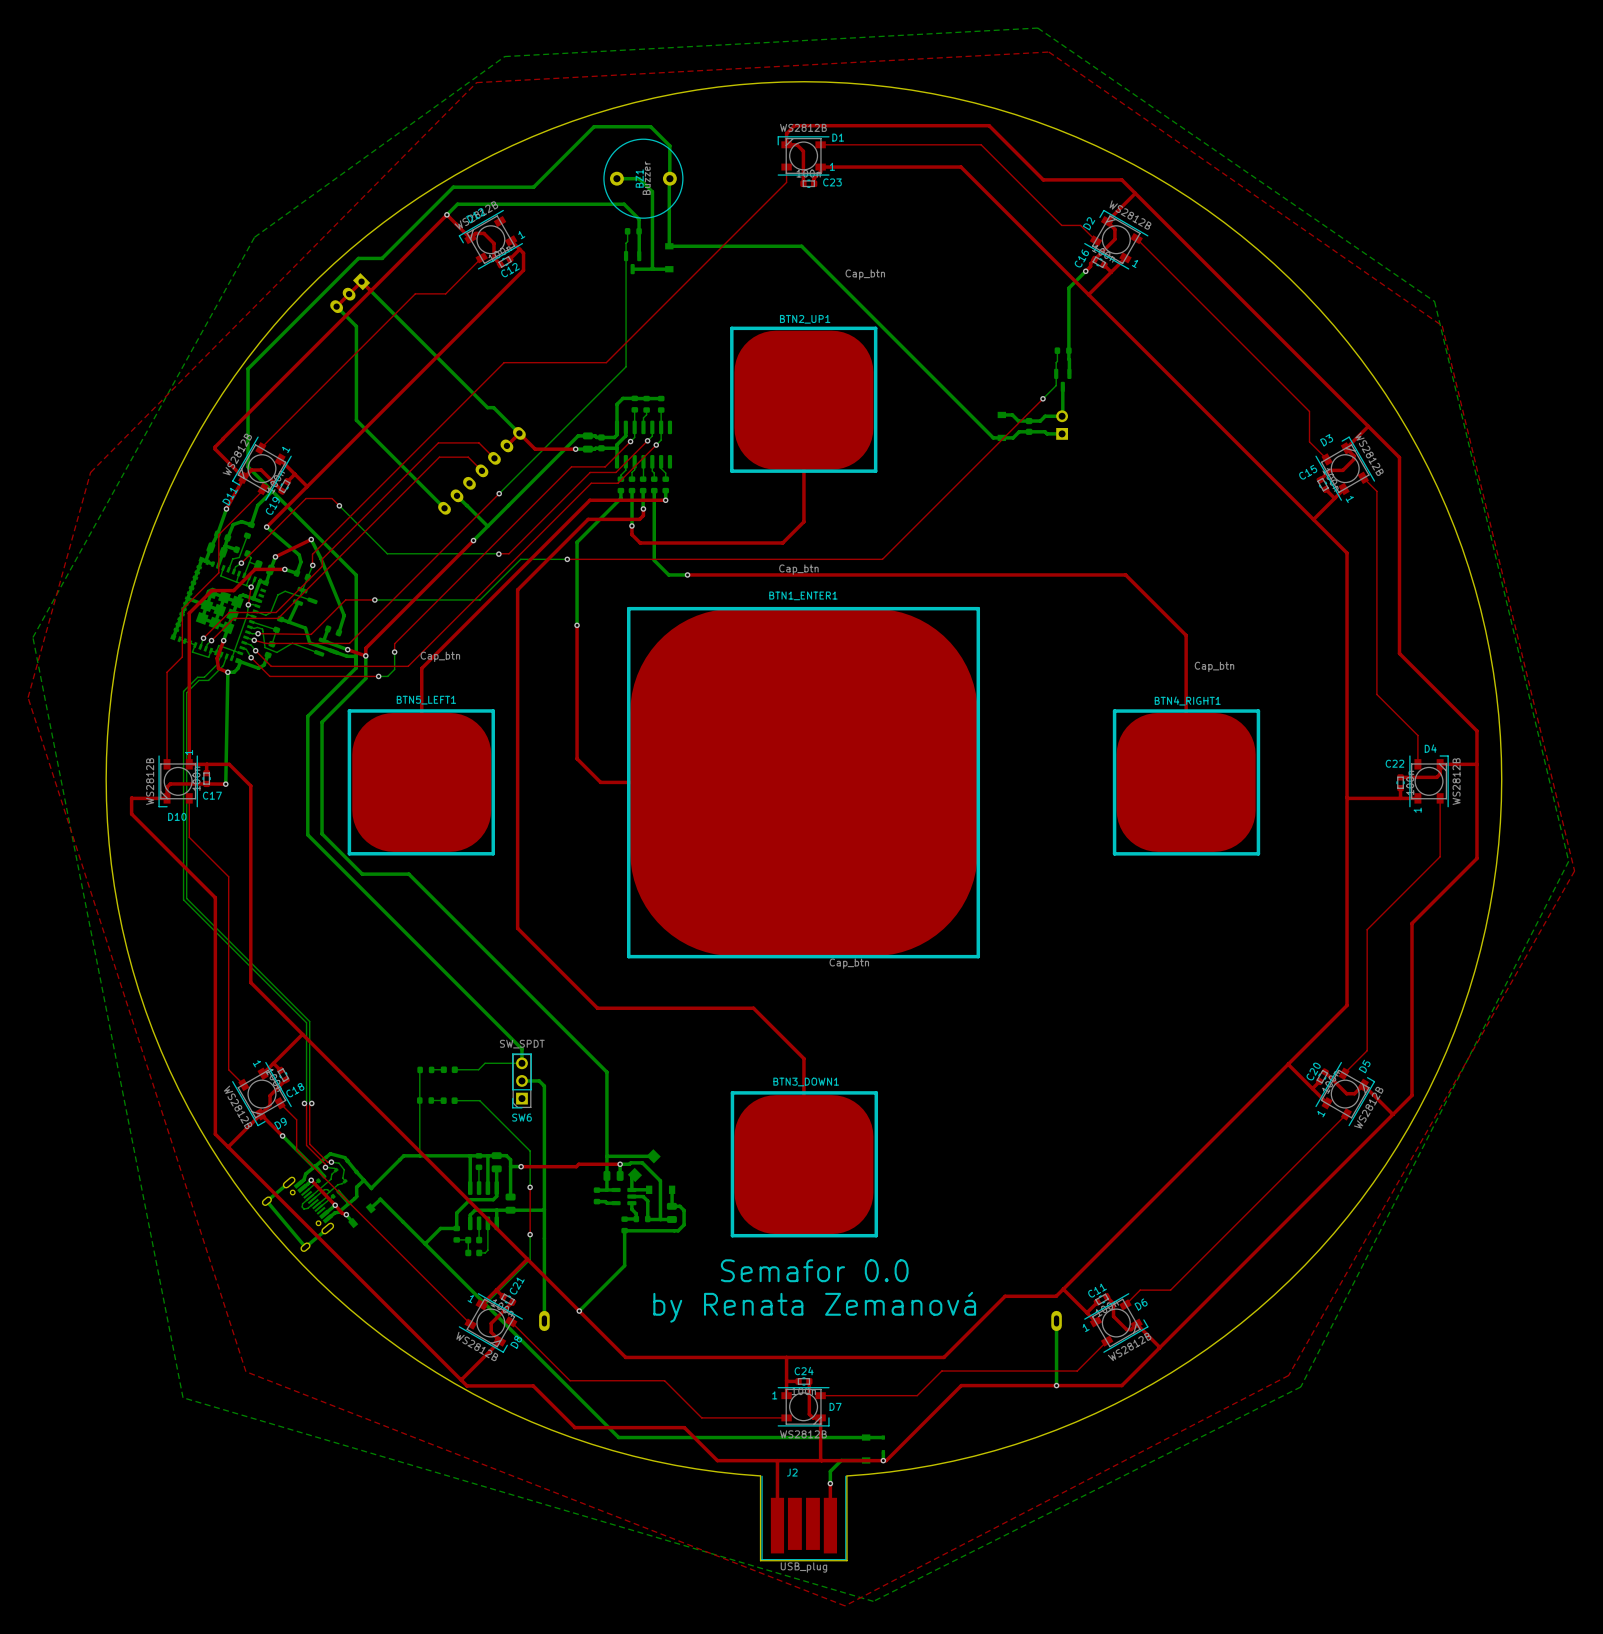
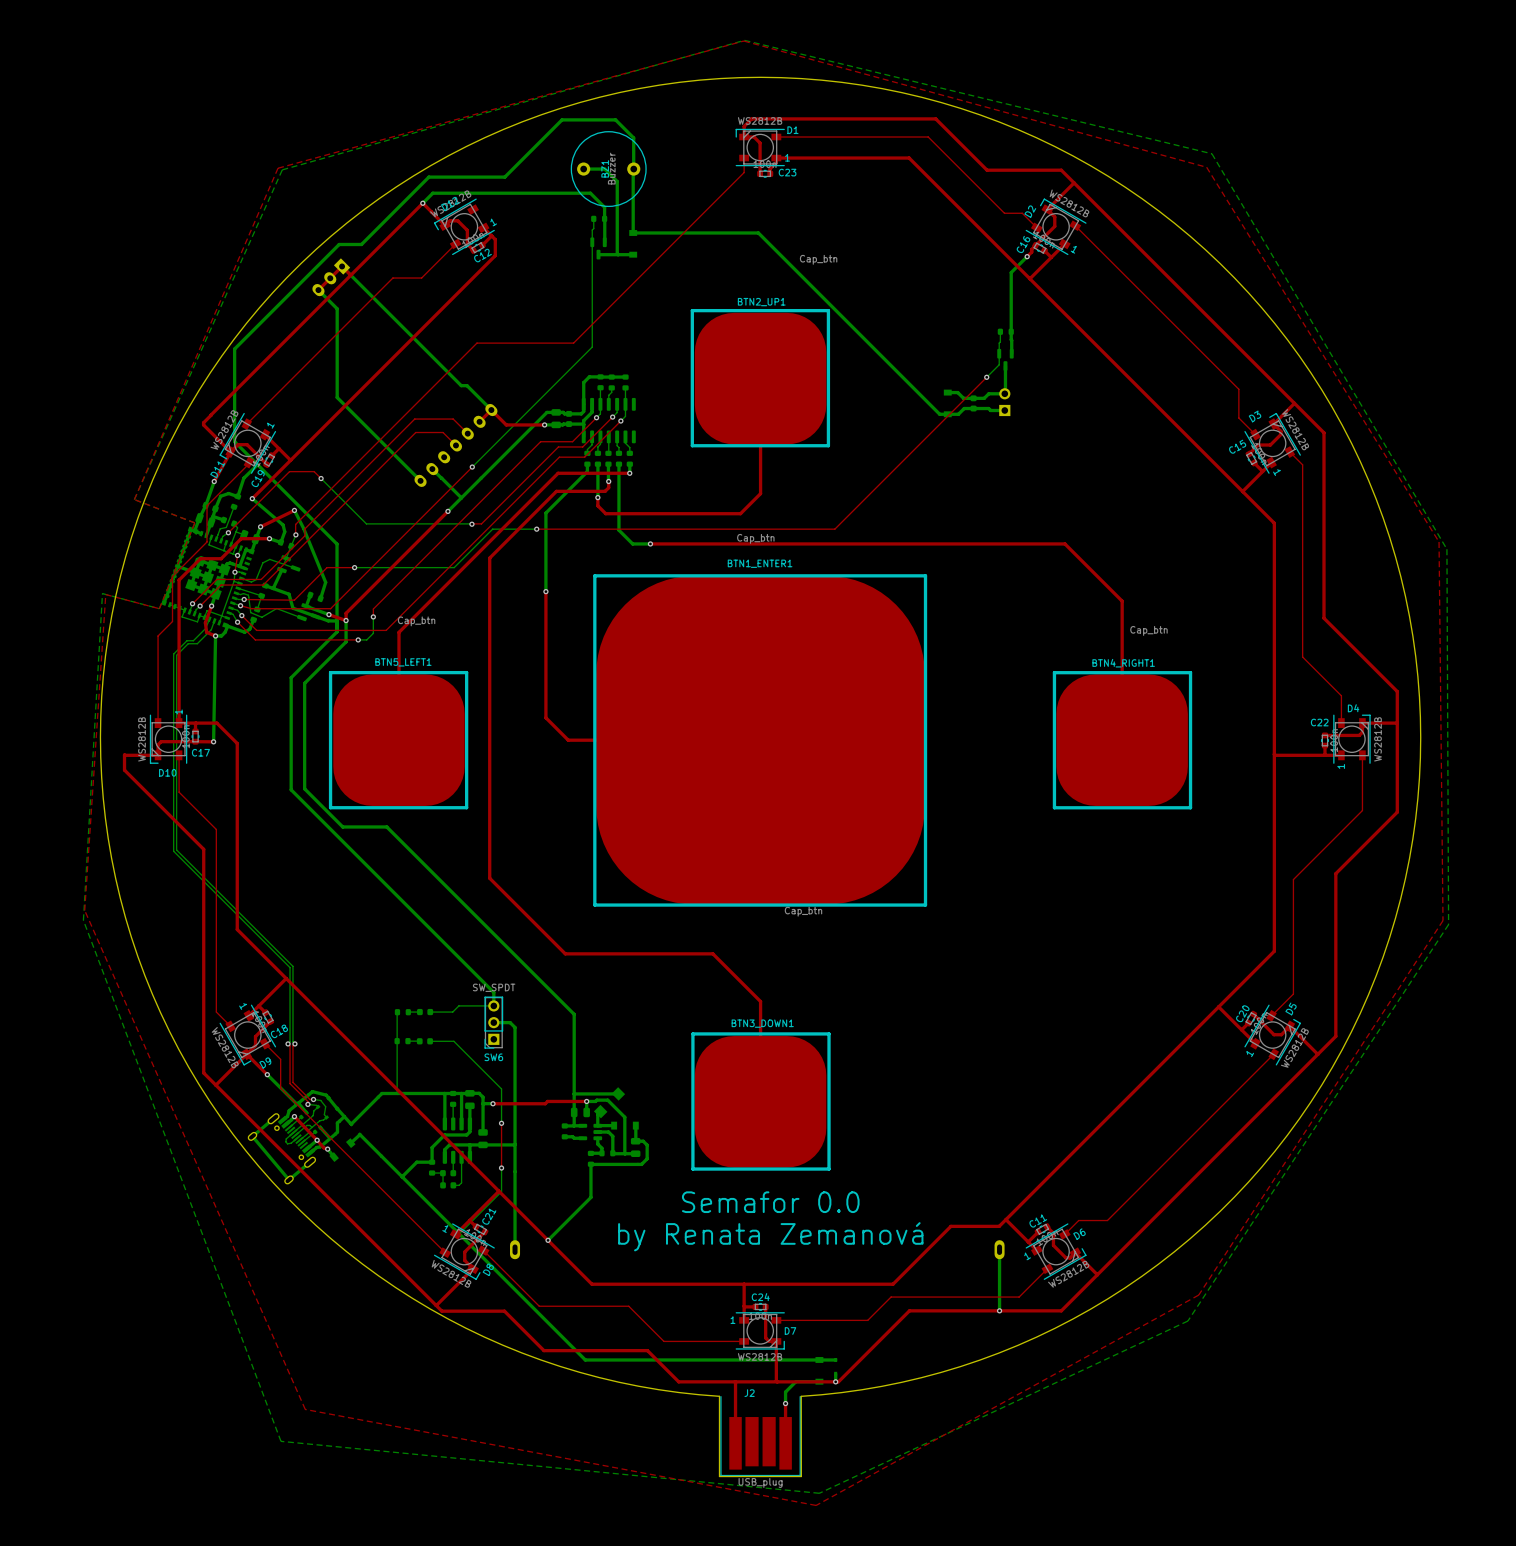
bottom zone outline: (1037, 28) (504, 56) (254, 237) (32, 637) (183, 1397) (873, 1601) (1300, 1386) (1568, 861) (1434, 301) (1037, 28) -> (744, 40) (282, 169) (134, 499) (194, 522) (159, 608) (102, 593) (83, 920) (280, 1441) (819, 1493) (1187, 1321) (1448, 924) (1446, 549) (1211, 153) (744, 40)
top zone outline: (1048, 52) (476, 82) (90, 472) (28, 697) (245, 1371) (844, 1605) (1288, 1375) (1574, 871) (1442, 325) (1048, 52) -> (743, 41) (278, 168) (134, 499) (194, 522) (159, 608) (105, 594) (84, 910) (305, 1409) (816, 1505) (1198, 1295) (1442, 920) (1439, 541) (1206, 167) (743, 41)

